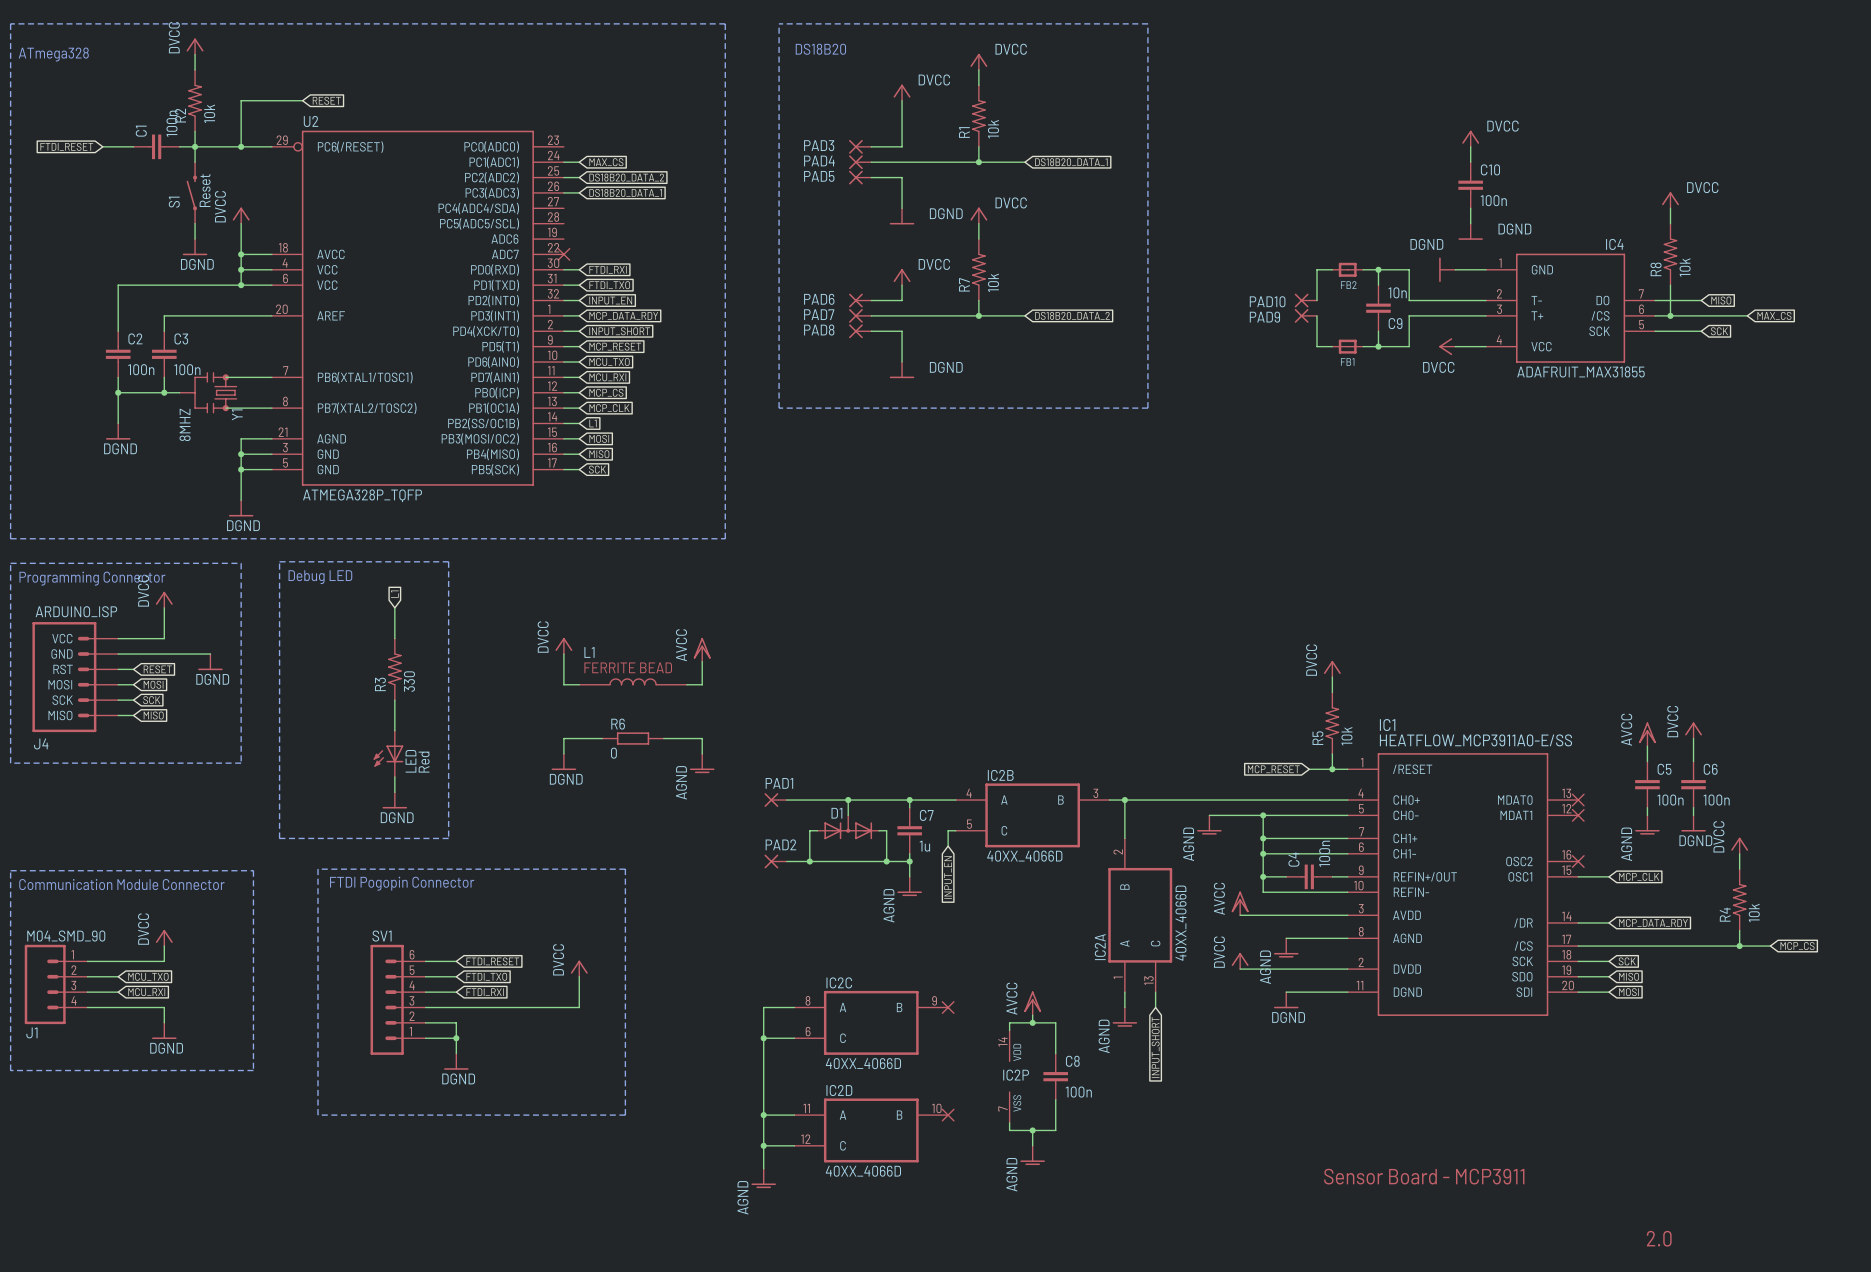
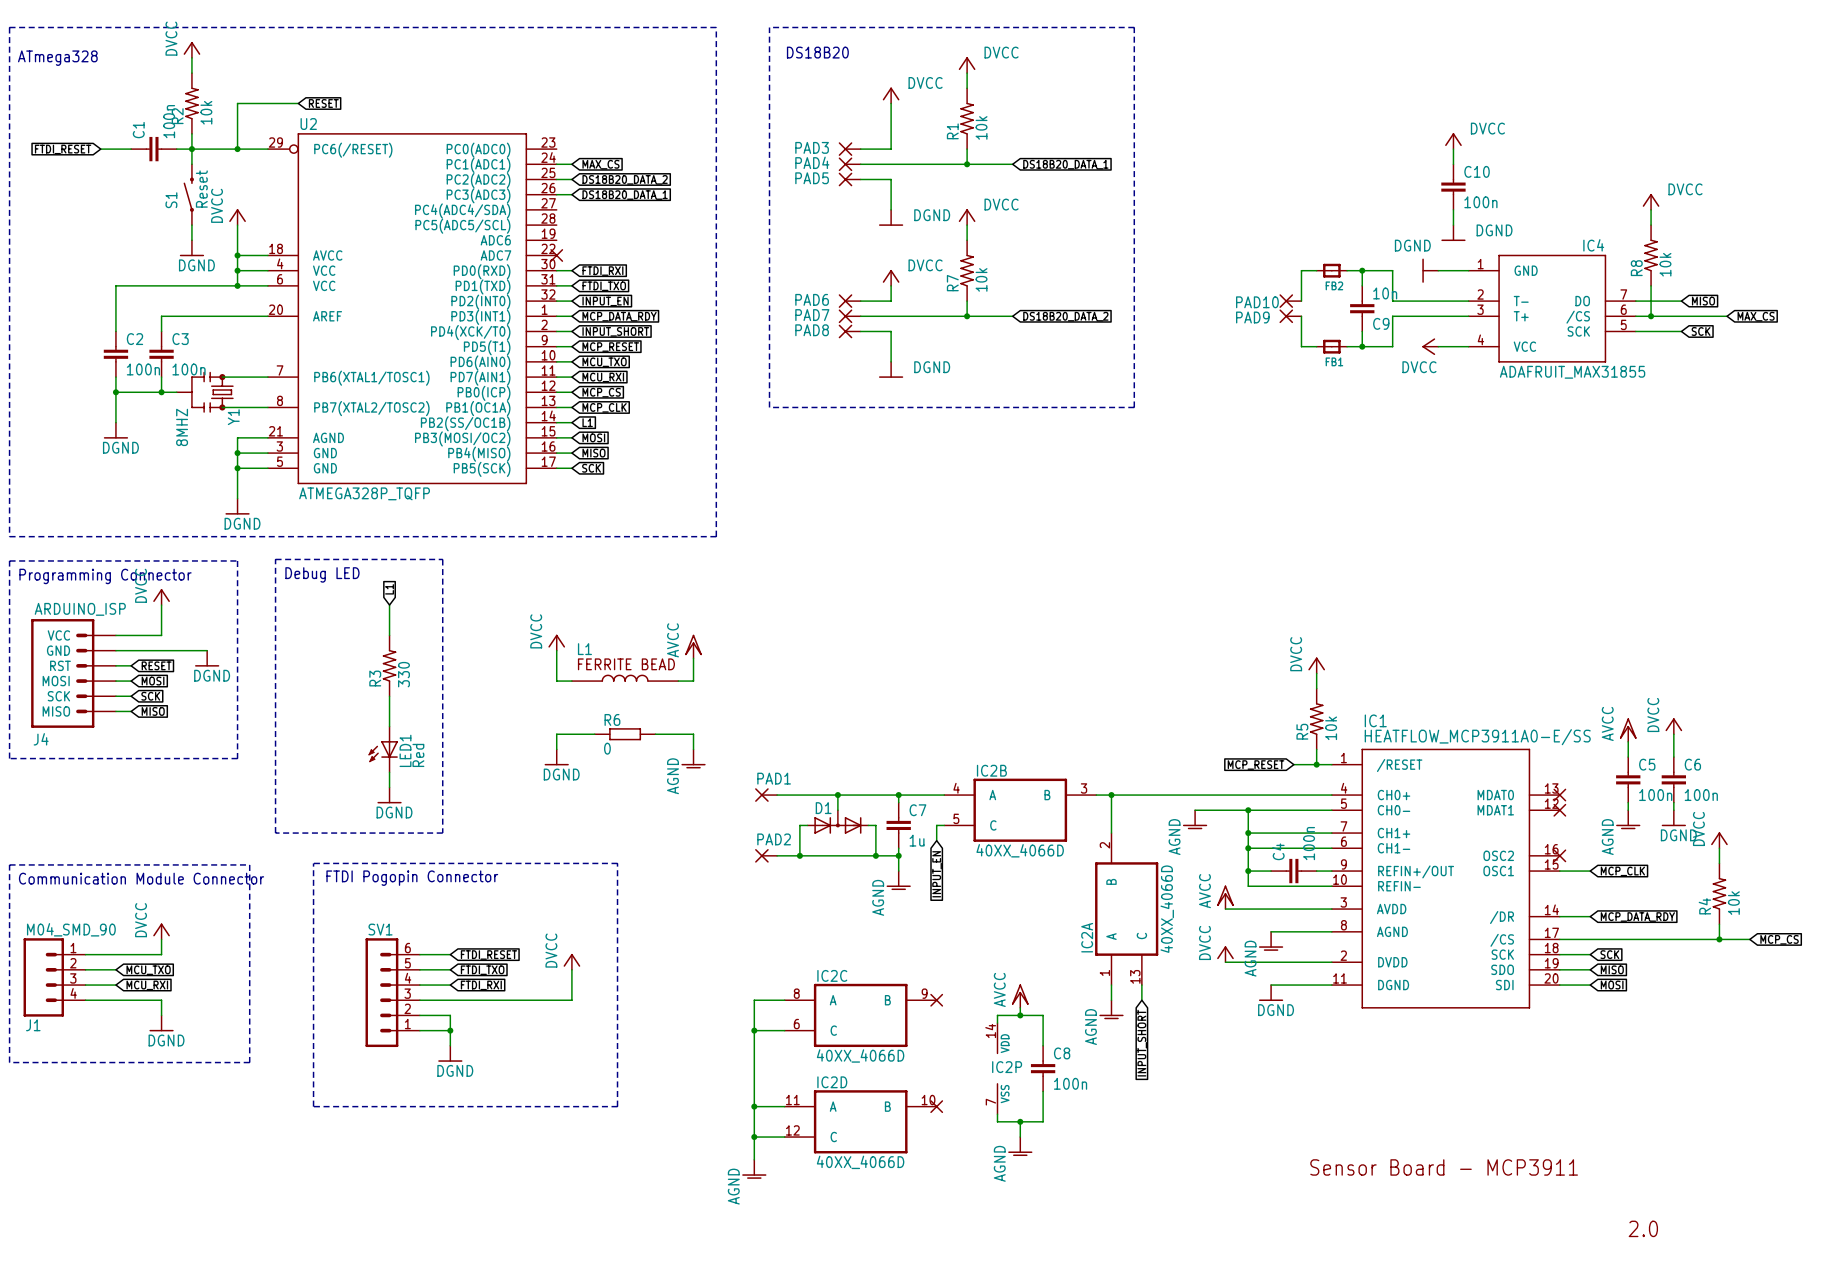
LED name: LED (410, 761) -> LED1 (405, 750)

